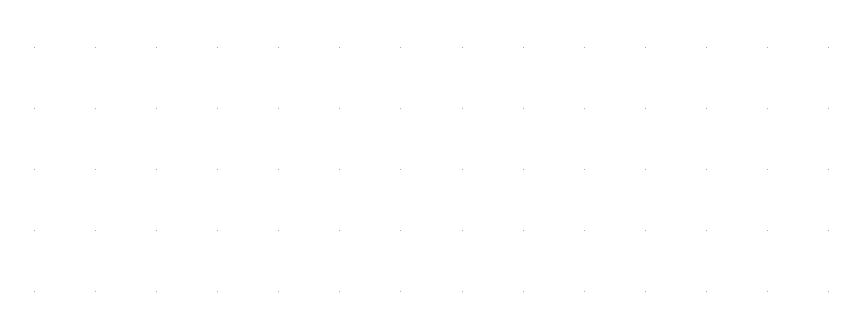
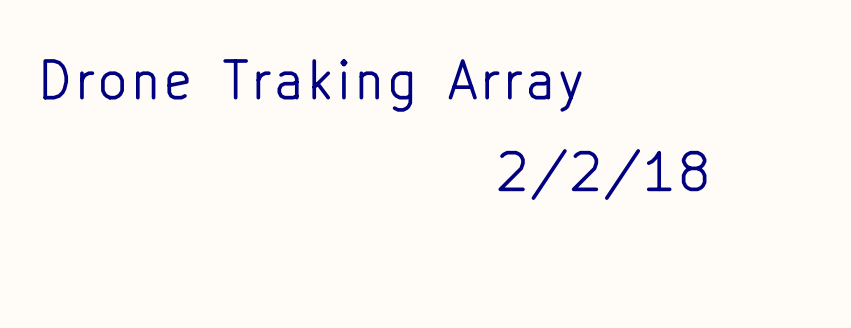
text: none -> Drone Traking Array (312, 85)
text: none -> 2/2/18 (602, 174)

